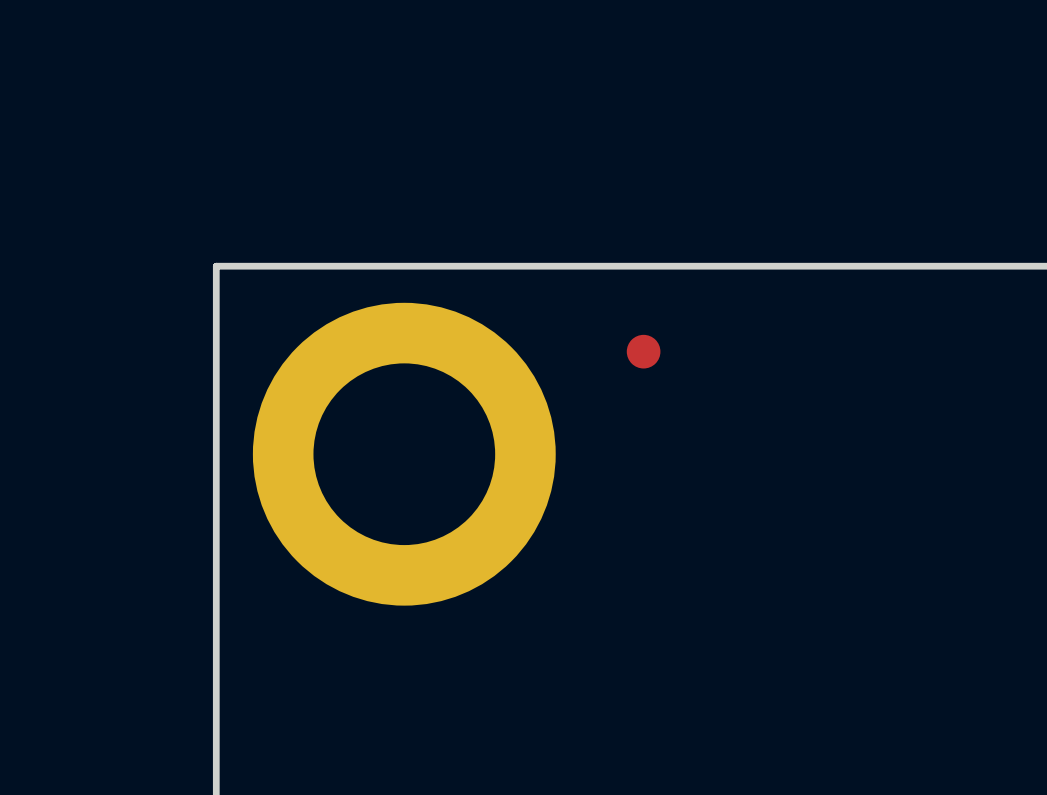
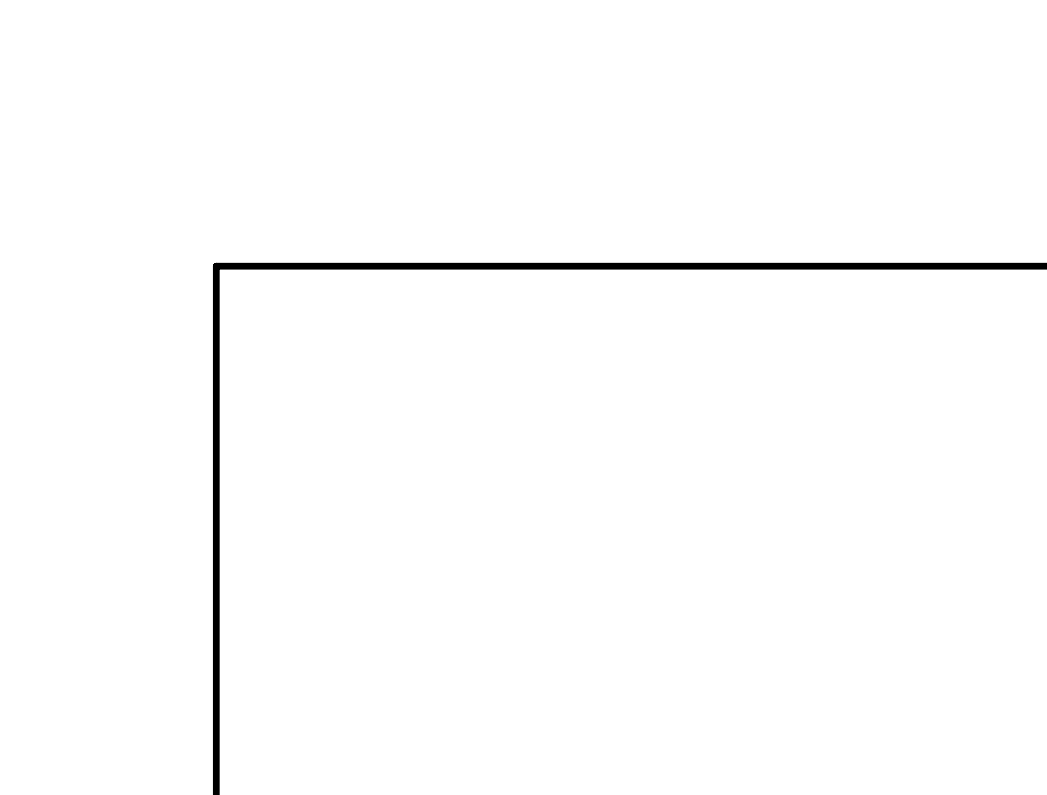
part: (643, 351) -> none
part: (404, 454) -> none

